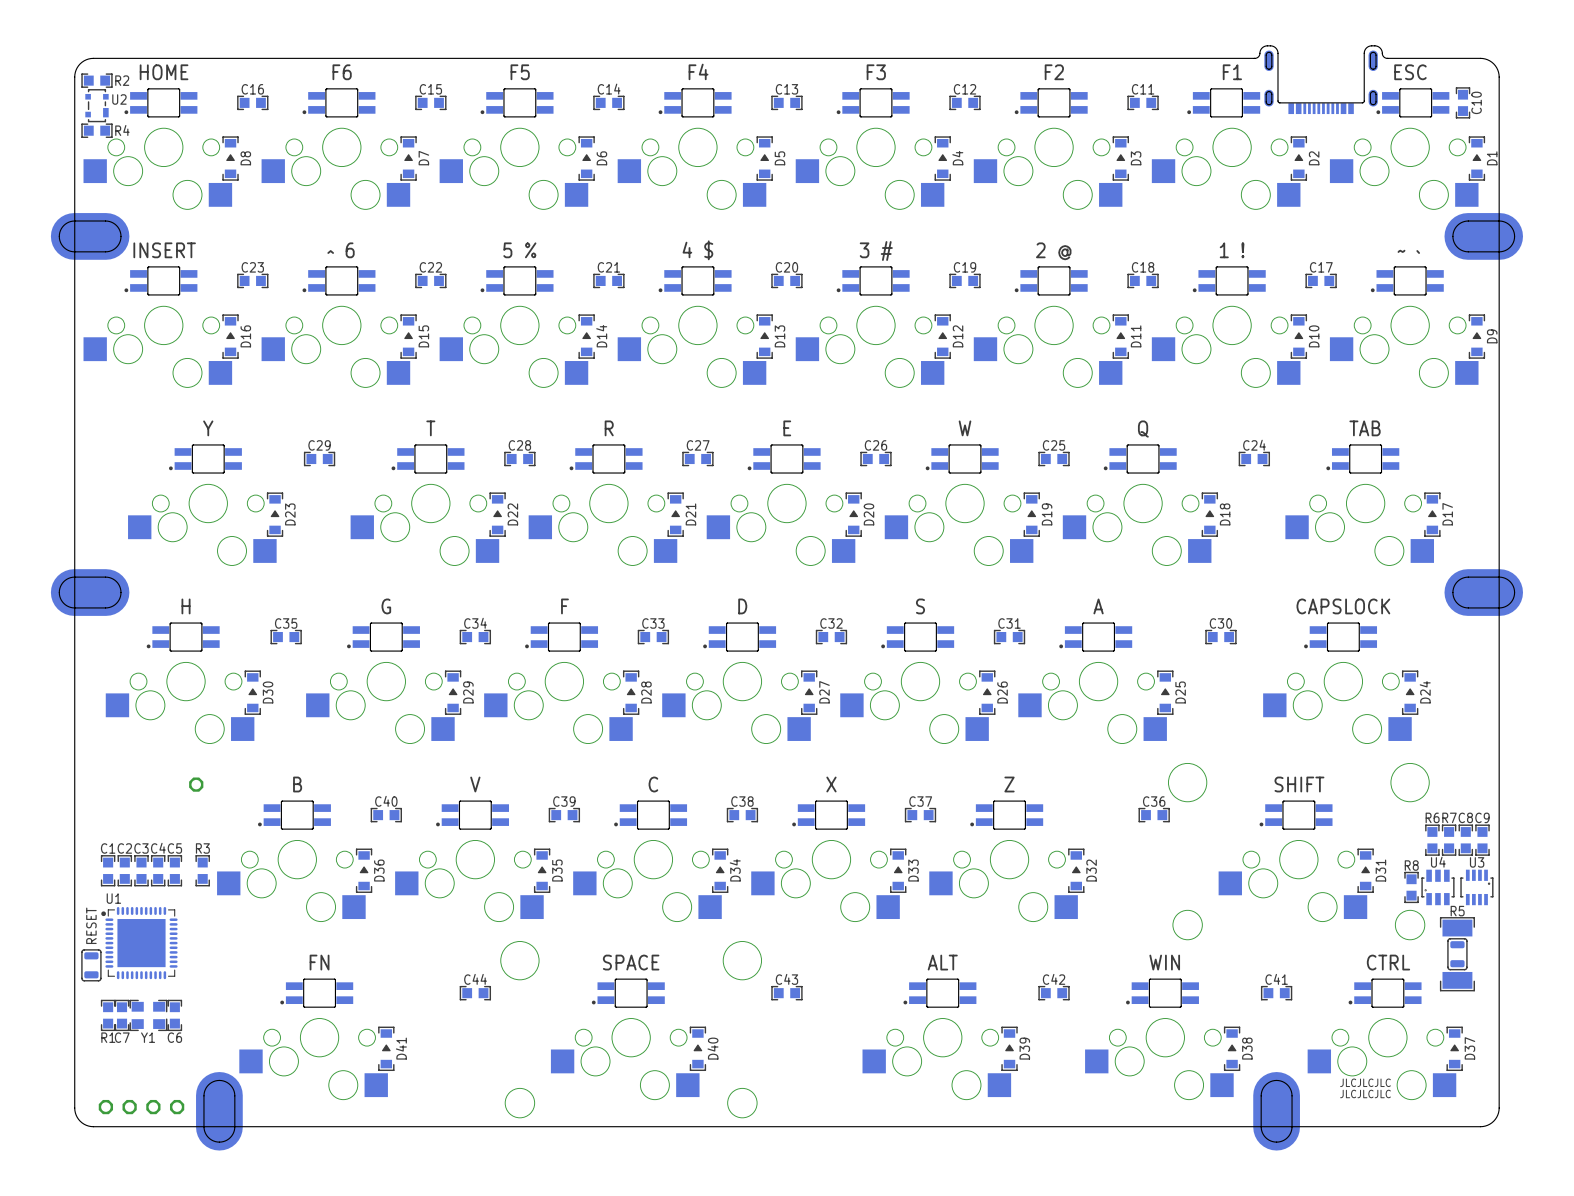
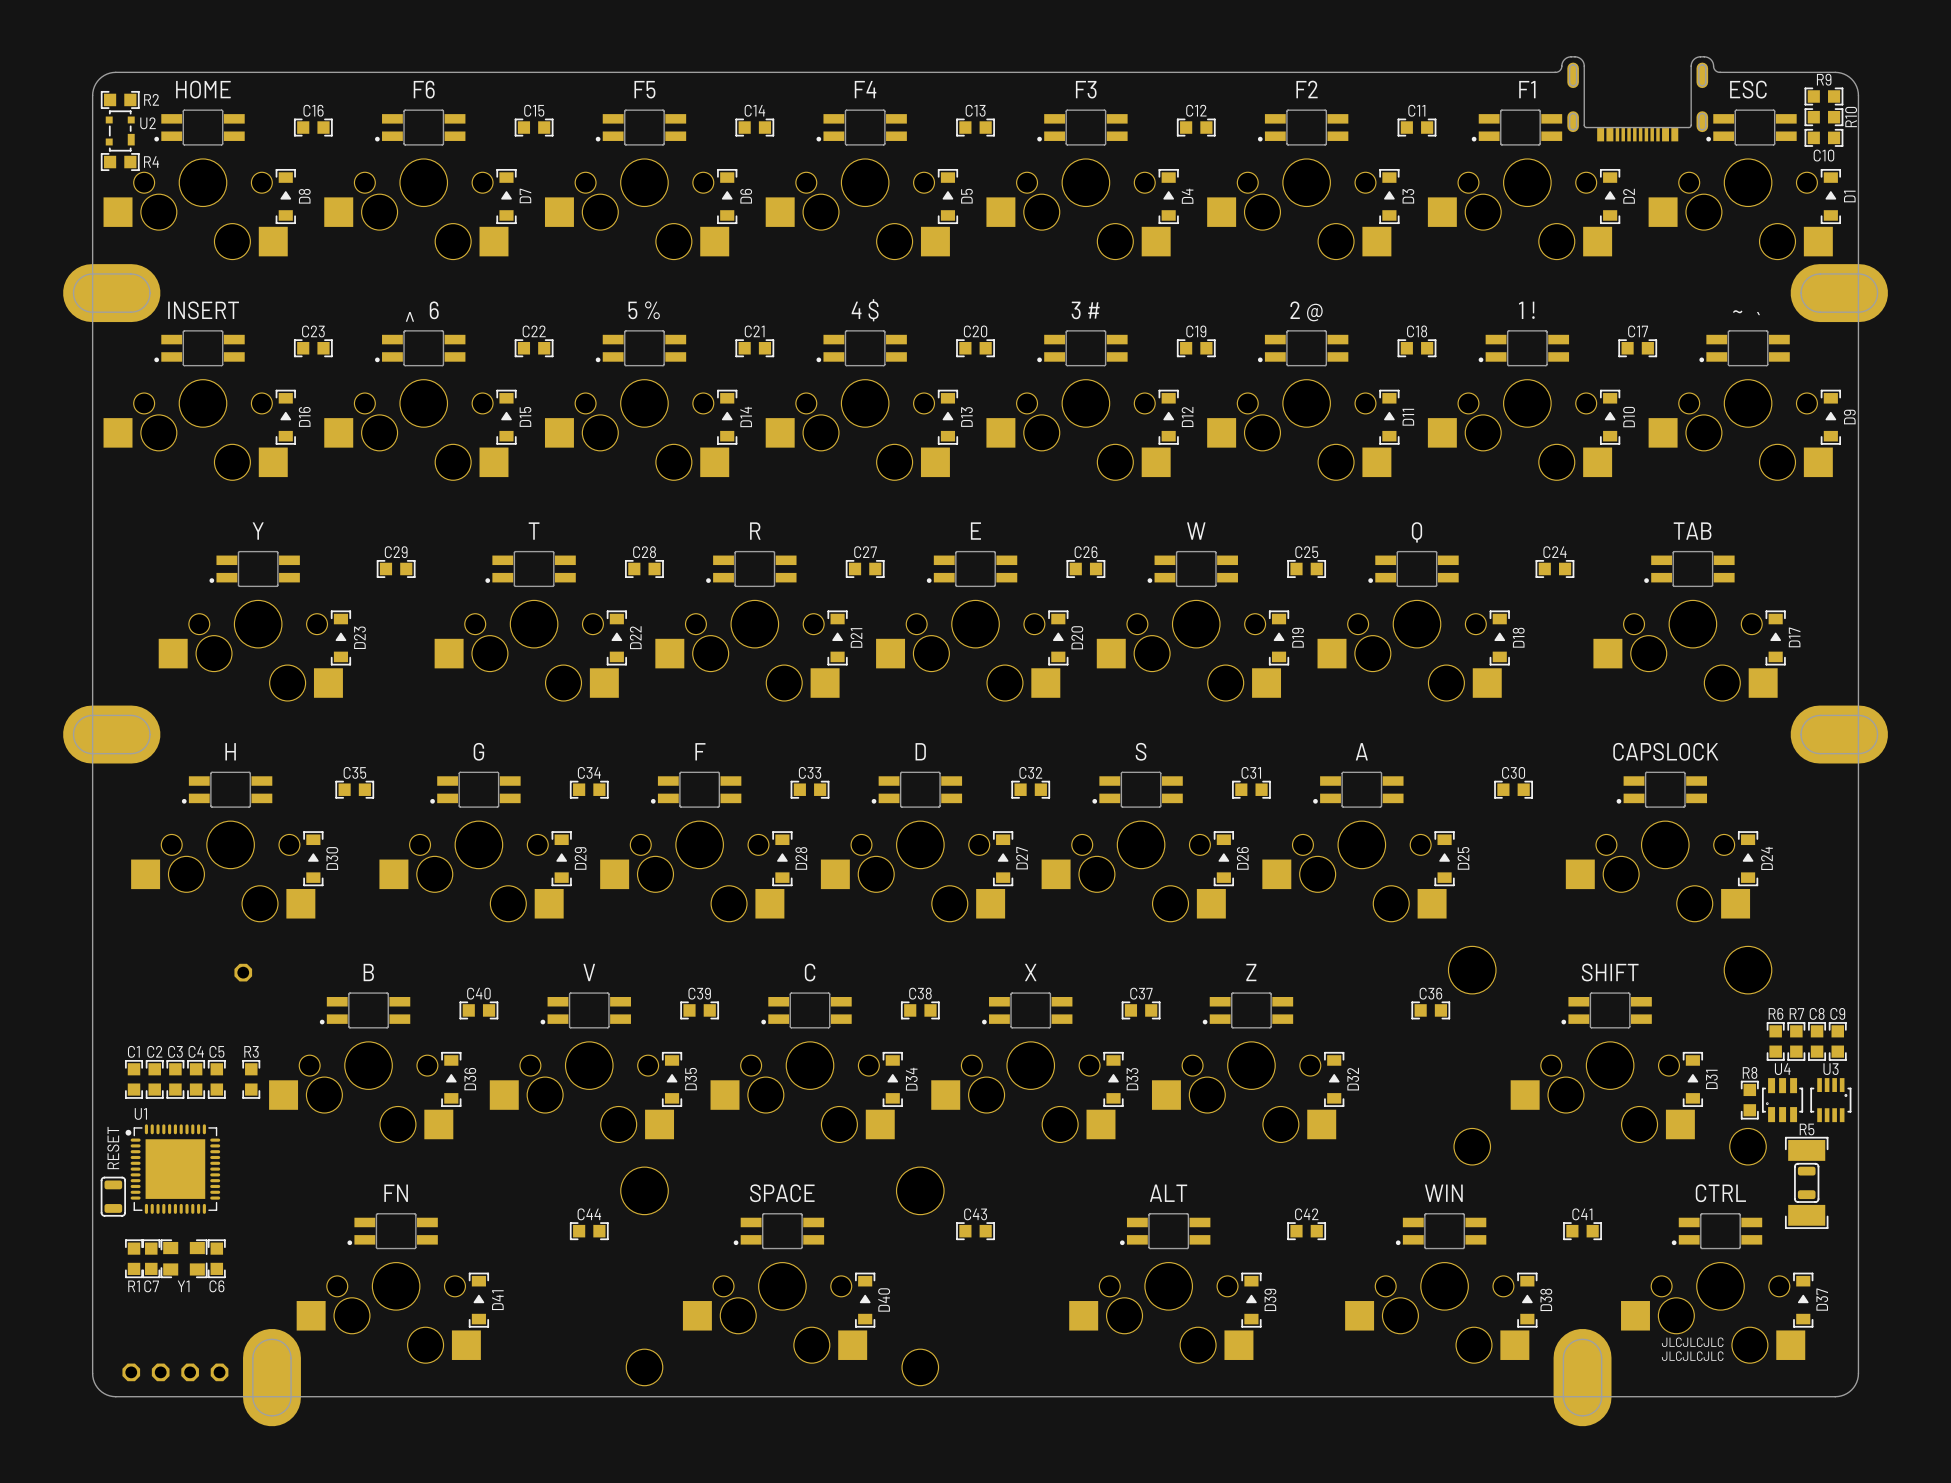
R9: none -> (1823, 96)
R10: none -> (1823, 117)
C10 rotation: 0° (1463, 102) -> 90° clockwise (1823, 137)

